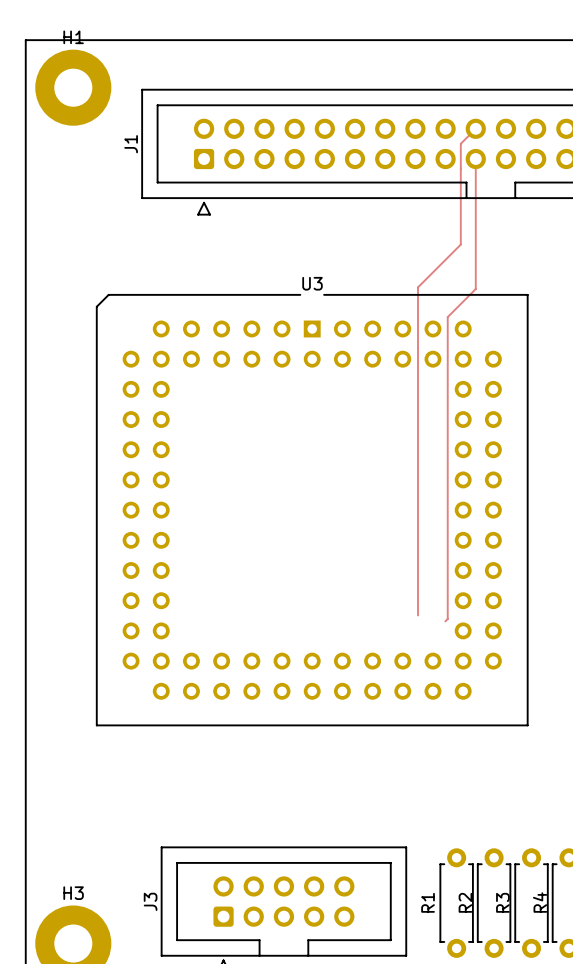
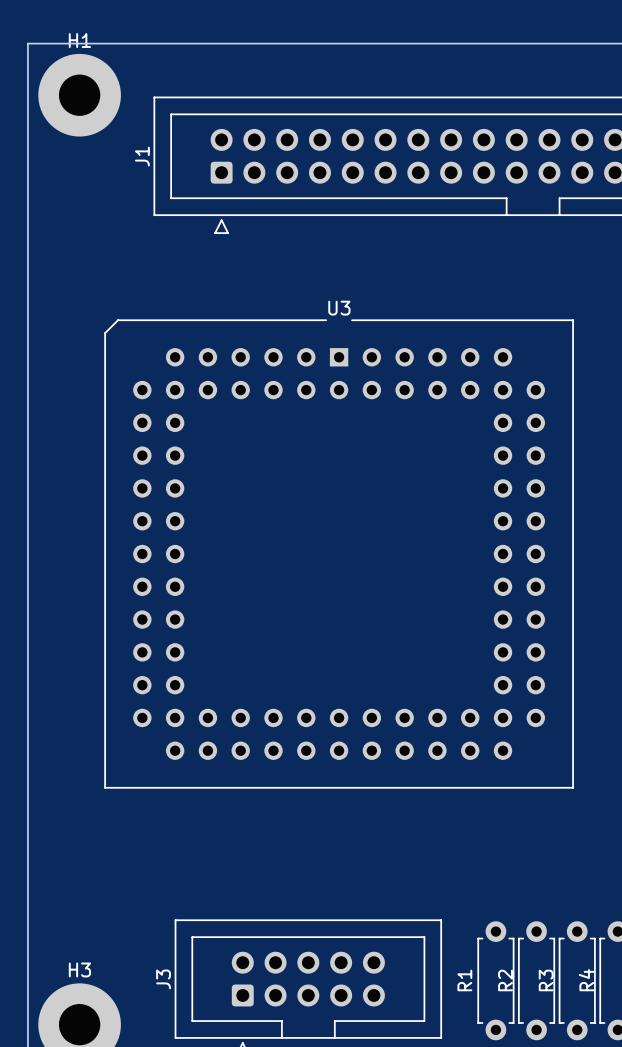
track: (475, 128) (460, 143) (460, 244) (418, 287) (418, 615) -> none
track: (475, 159) (475, 289) (447, 317) (447, 619) (445, 621) -> none

